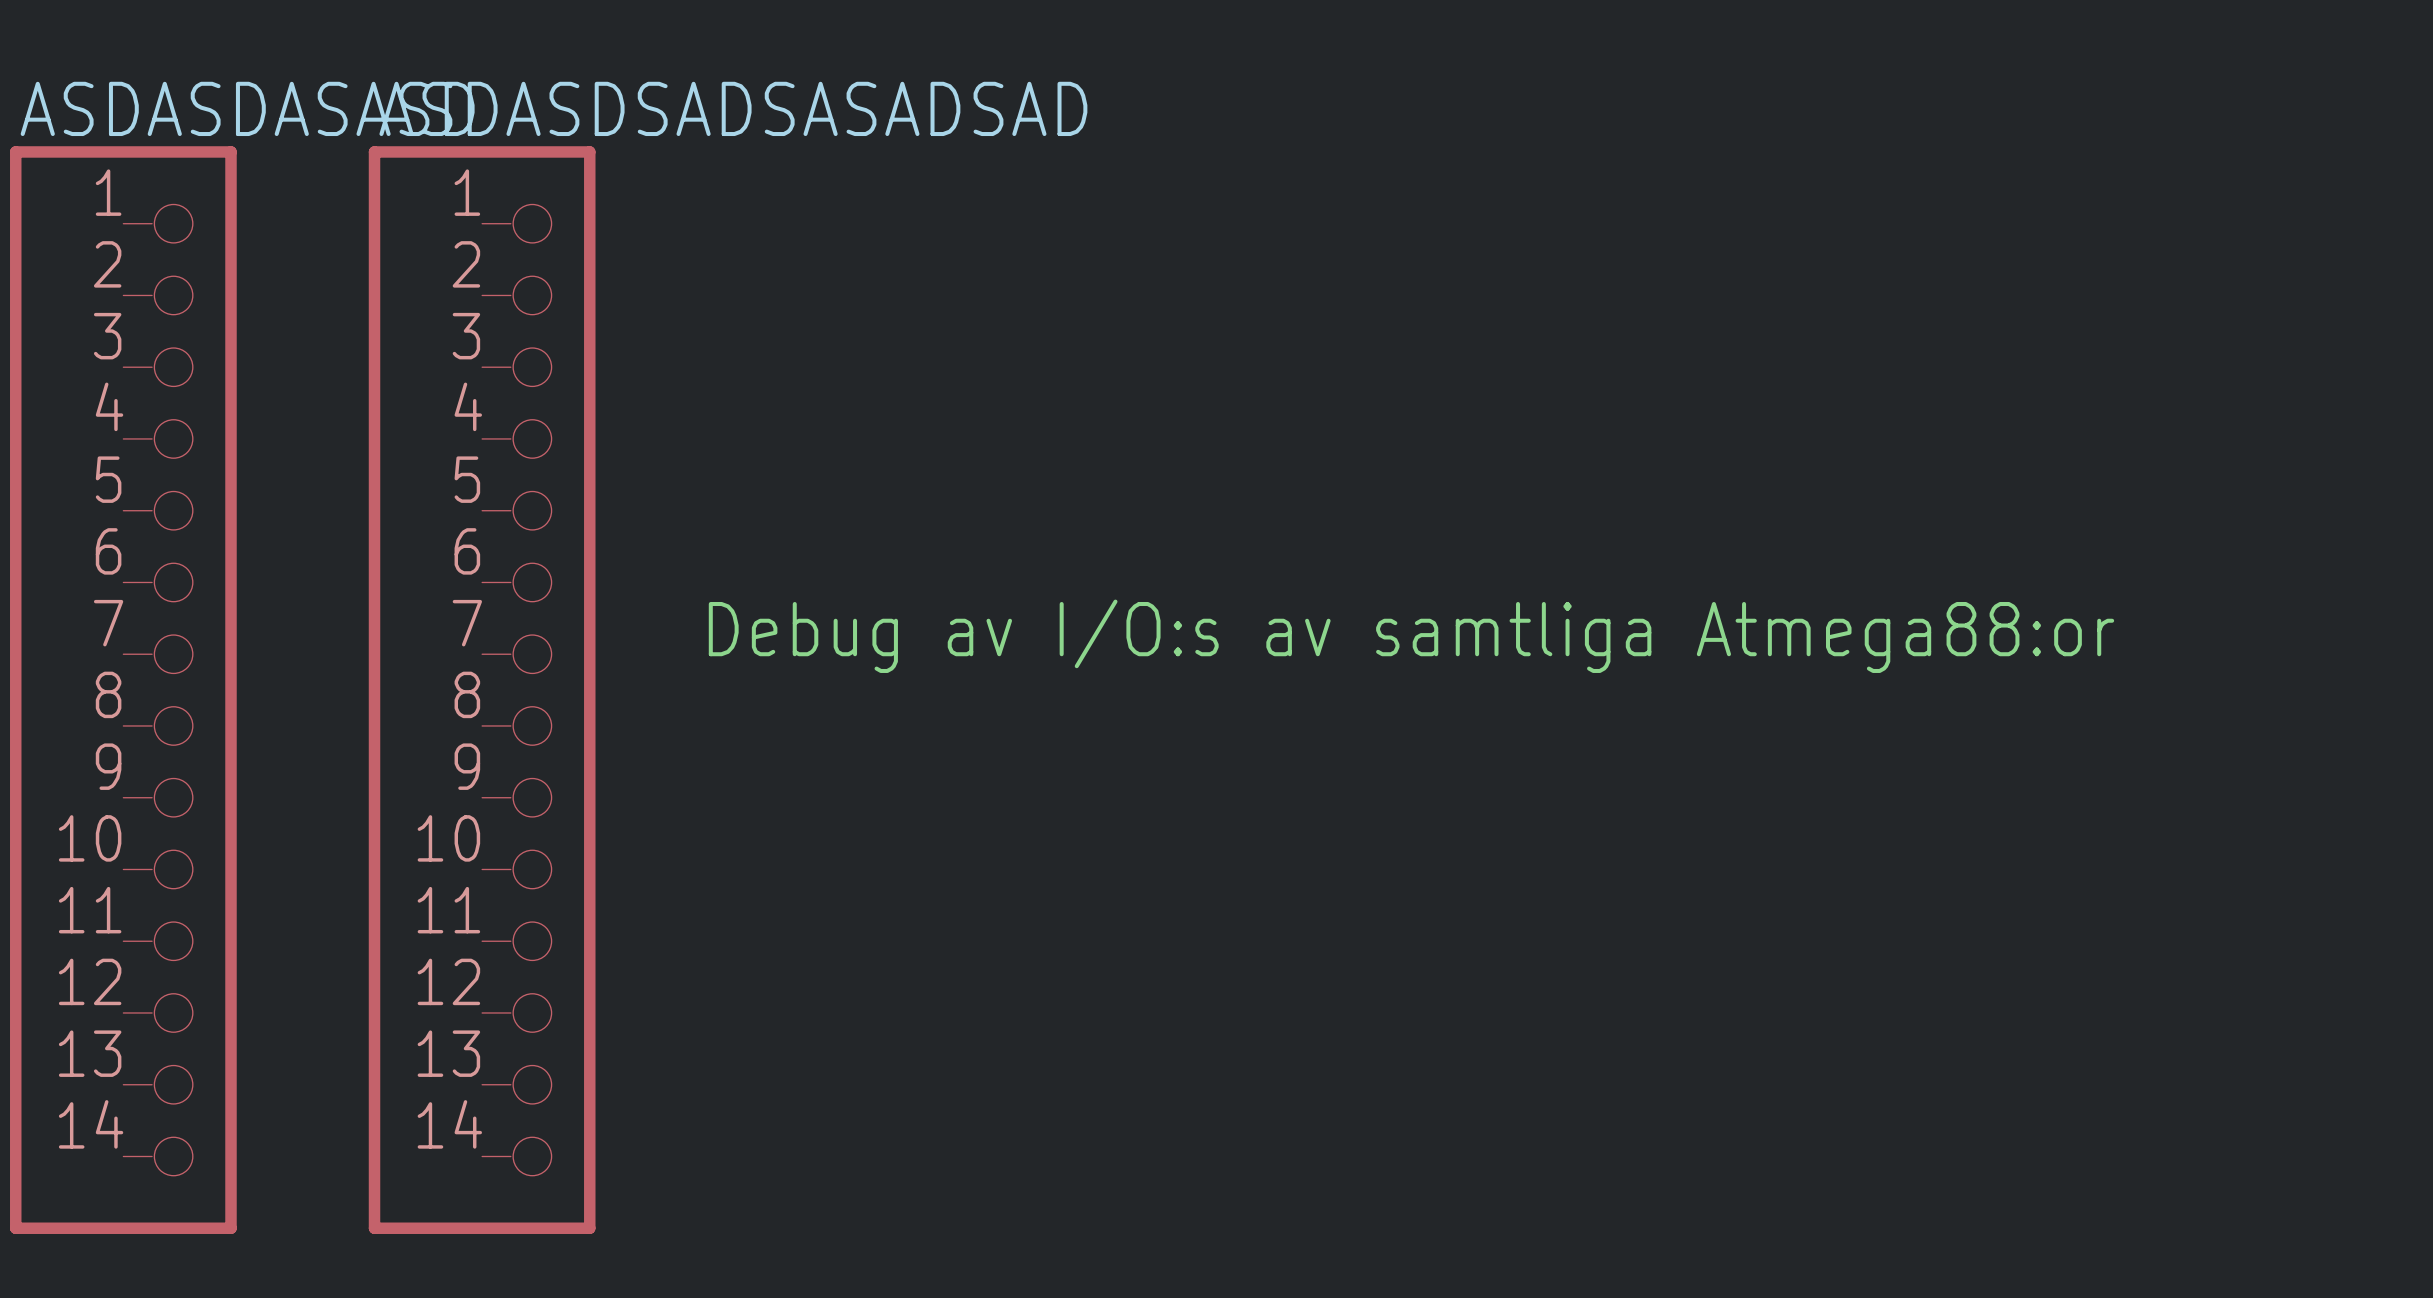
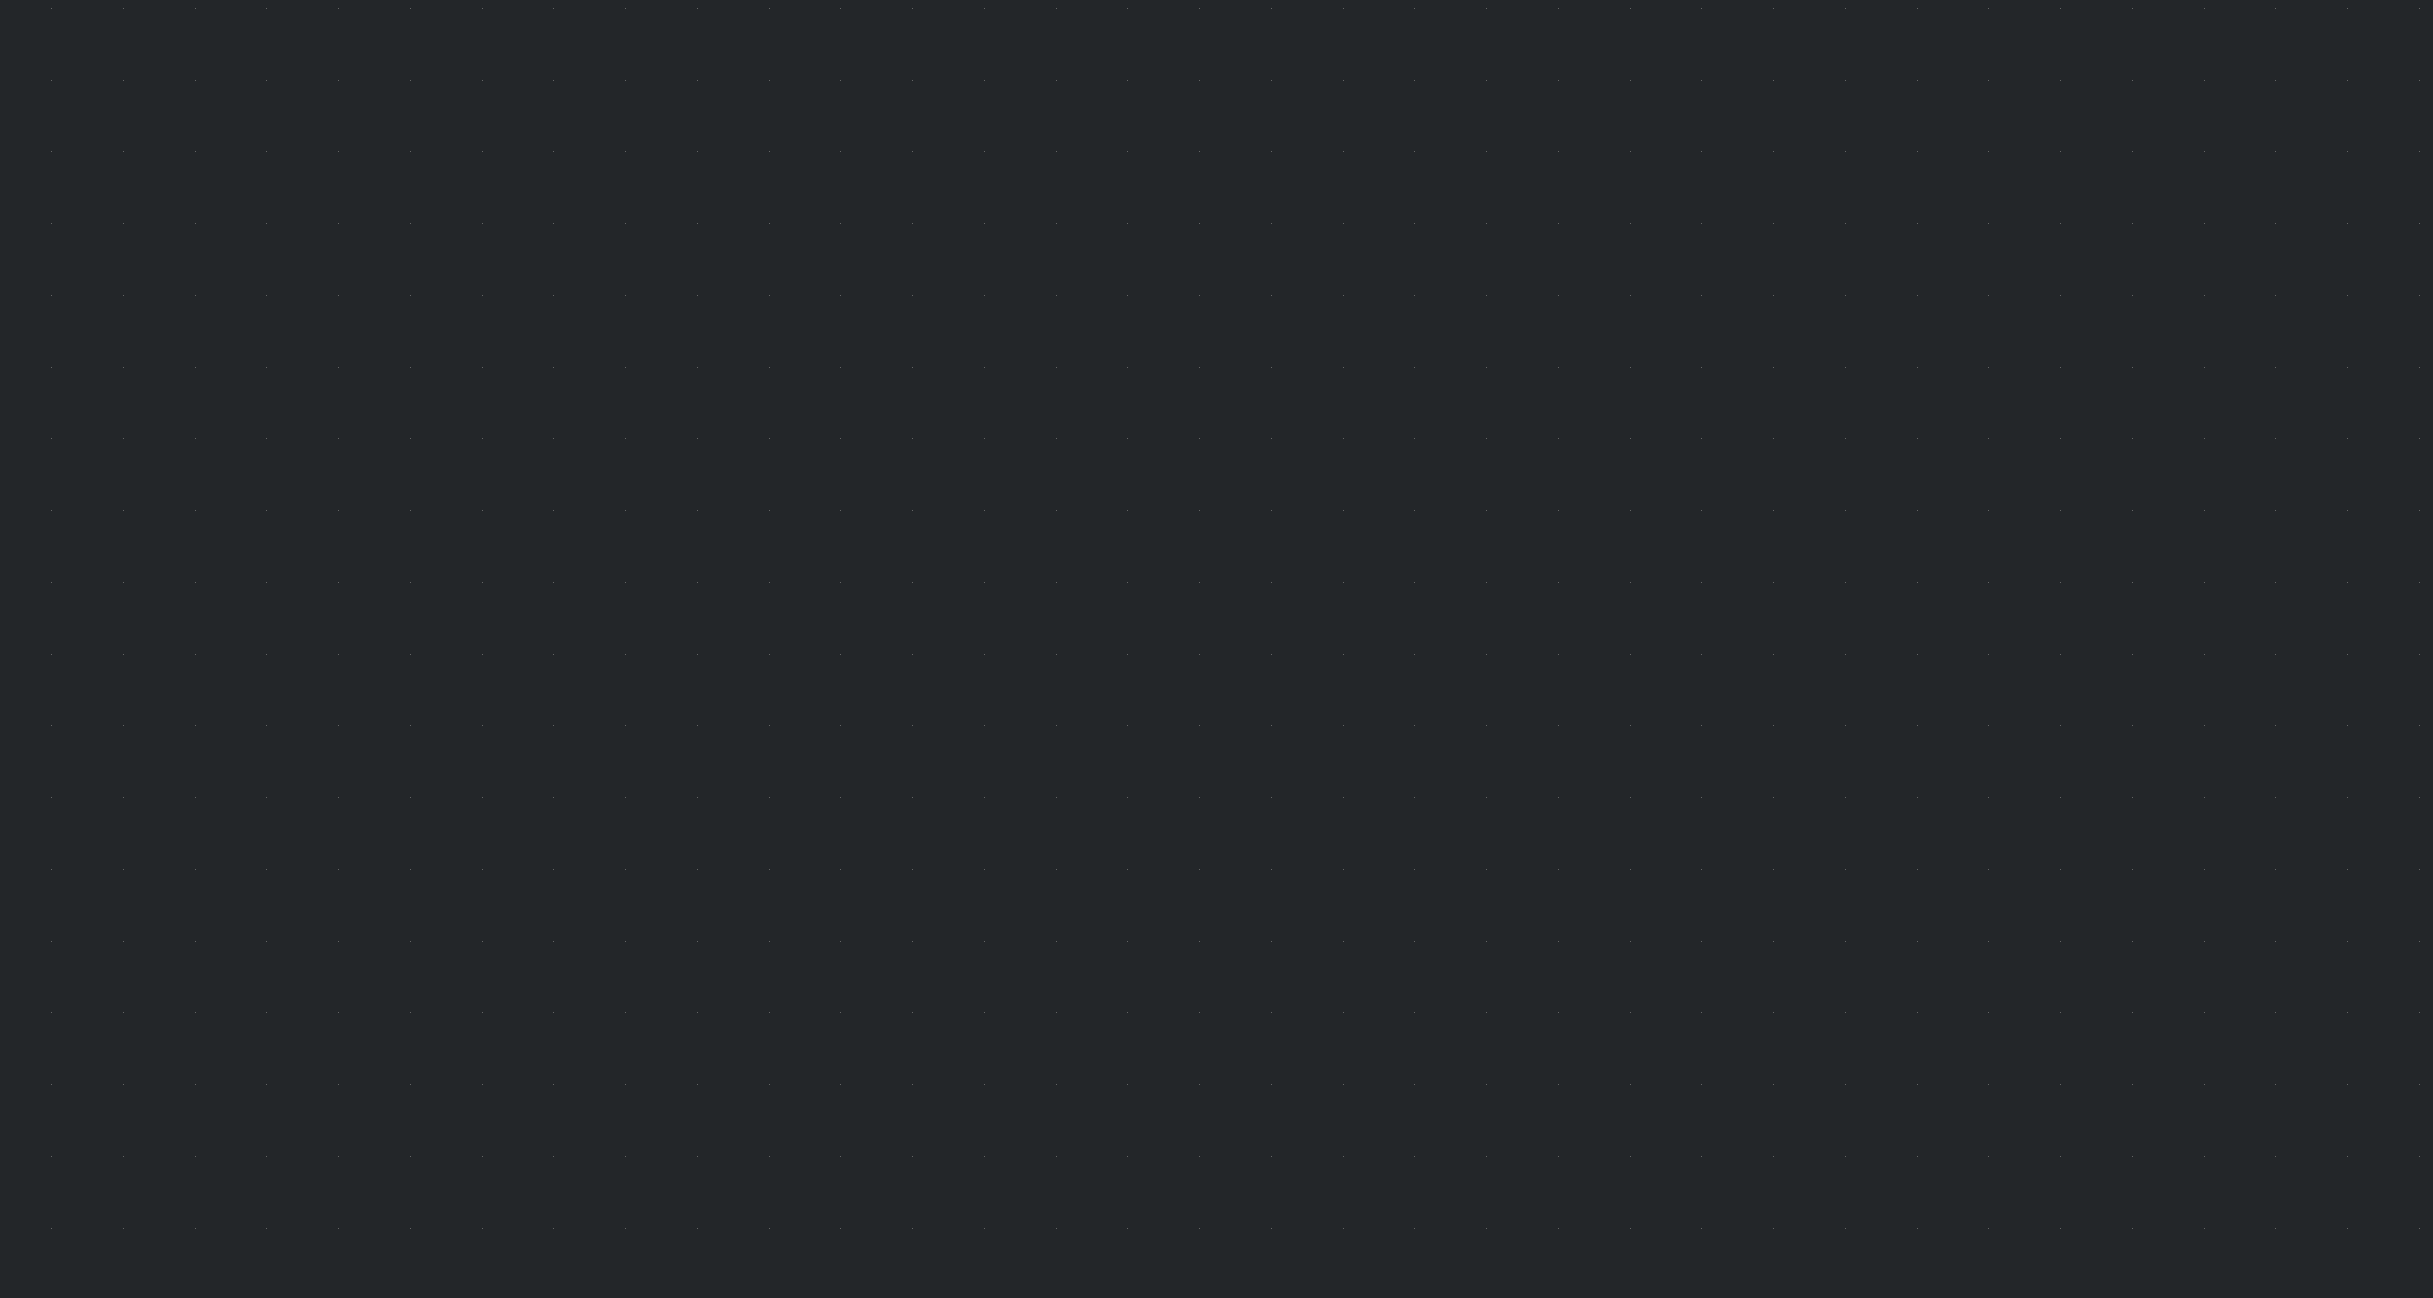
text: Debug av I/O:s av samtliga Atmega88:or (1411, 636) -> none
ASDASDASASD: (123, 690) -> none
ASDASDSADSASADSAD: (482, 690) -> none

